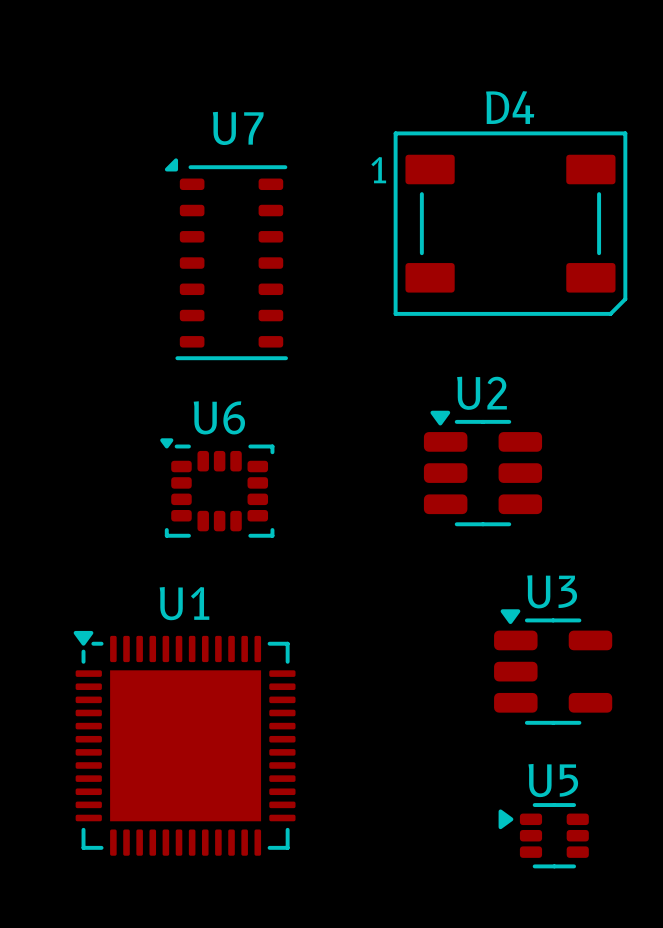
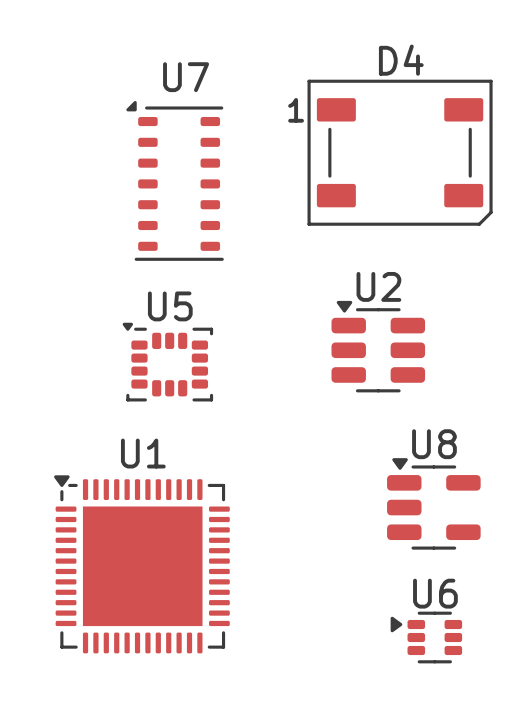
U6 name: U6 (219, 417) -> U5 (170, 306)
U3 name: U3 (552, 591) -> U8 (434, 444)
U5 name: U5 (553, 780) -> U6 (435, 593)

